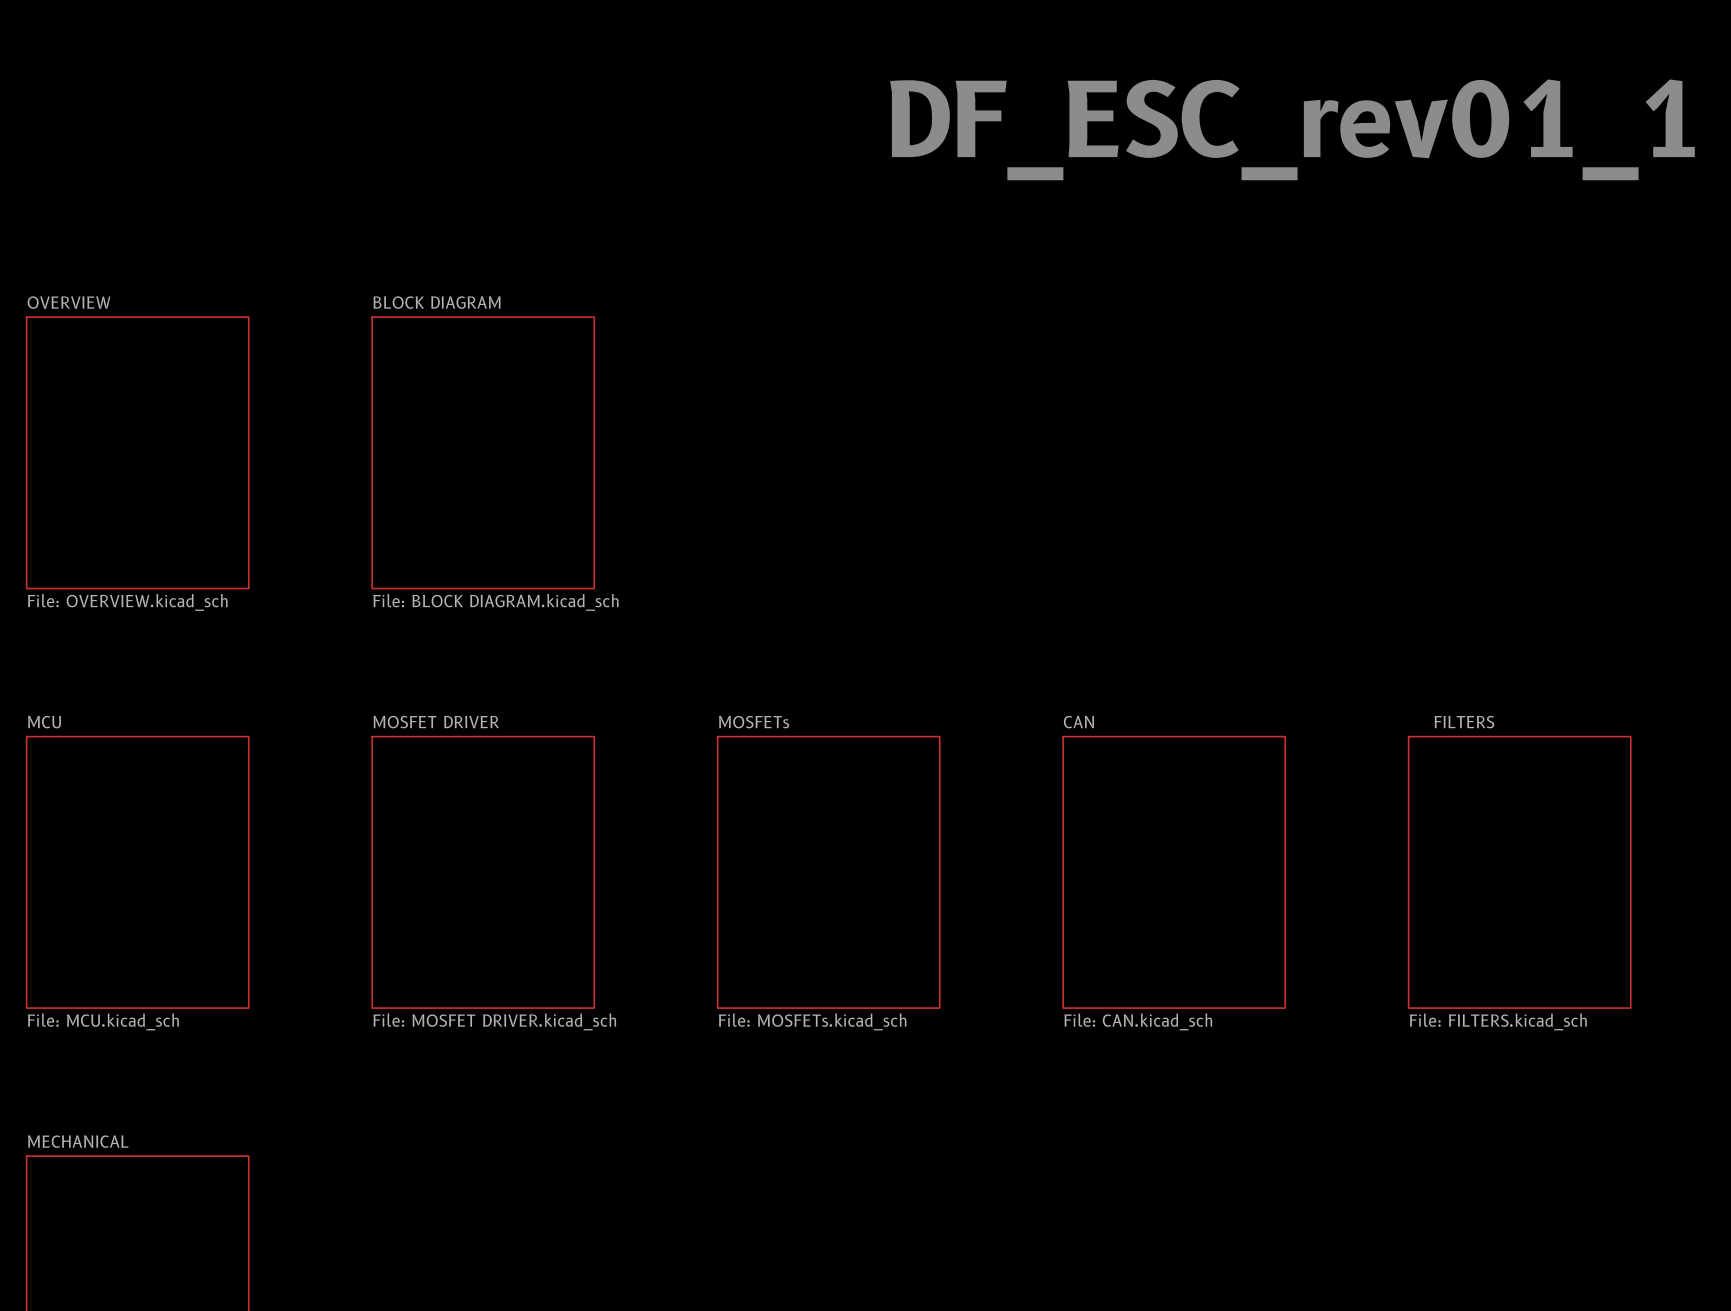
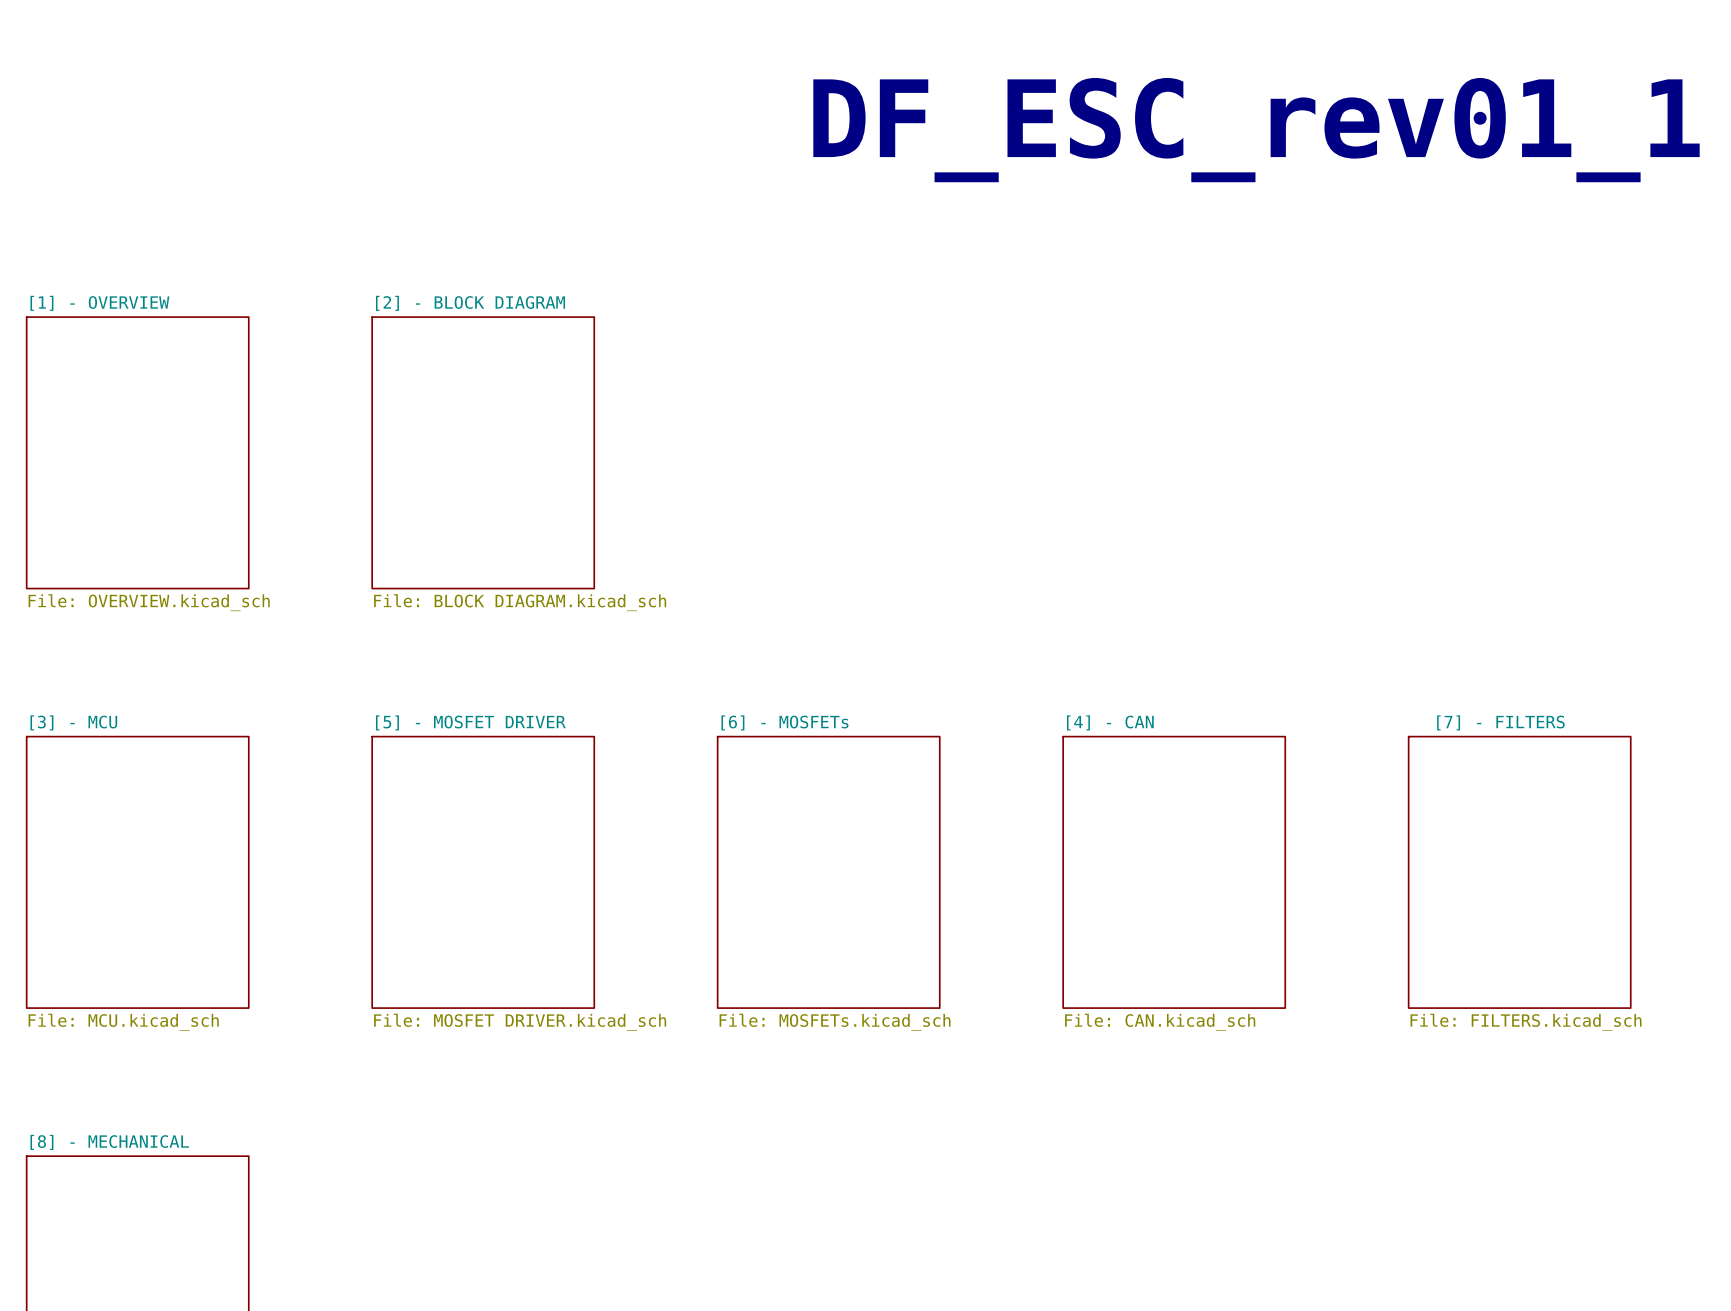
sheet OVERVIEW name: OVERVIEW (69, 302) -> [1] - OVERVIEW (99, 303)
sheet BLOCK DIAGRAM name: BLOCK DIAGRAM (436, 302) -> [2] - BLOCK DIAGRAM (470, 303)
sheet MCU name: MCU (44, 722) -> [3] - MCU (73, 722)
sheet MOSFET DRIVER name: MOSFET DRIVER (436, 722) -> [5] - MOSFET DRIVER (470, 722)
sheet MOSFETs name: MOSFETs (754, 722) -> [6] - MOSFETs (784, 722)
sheet CAN name: CAN (1078, 722) -> [4] - CAN (1110, 722)
sheet FILTERS name: FILTERS (1464, 722) -> [7] - FILTERS (1500, 722)
sheet MECHANICAL name: MECHANICAL (78, 1141) -> [8] - MECHANICAL (109, 1142)

